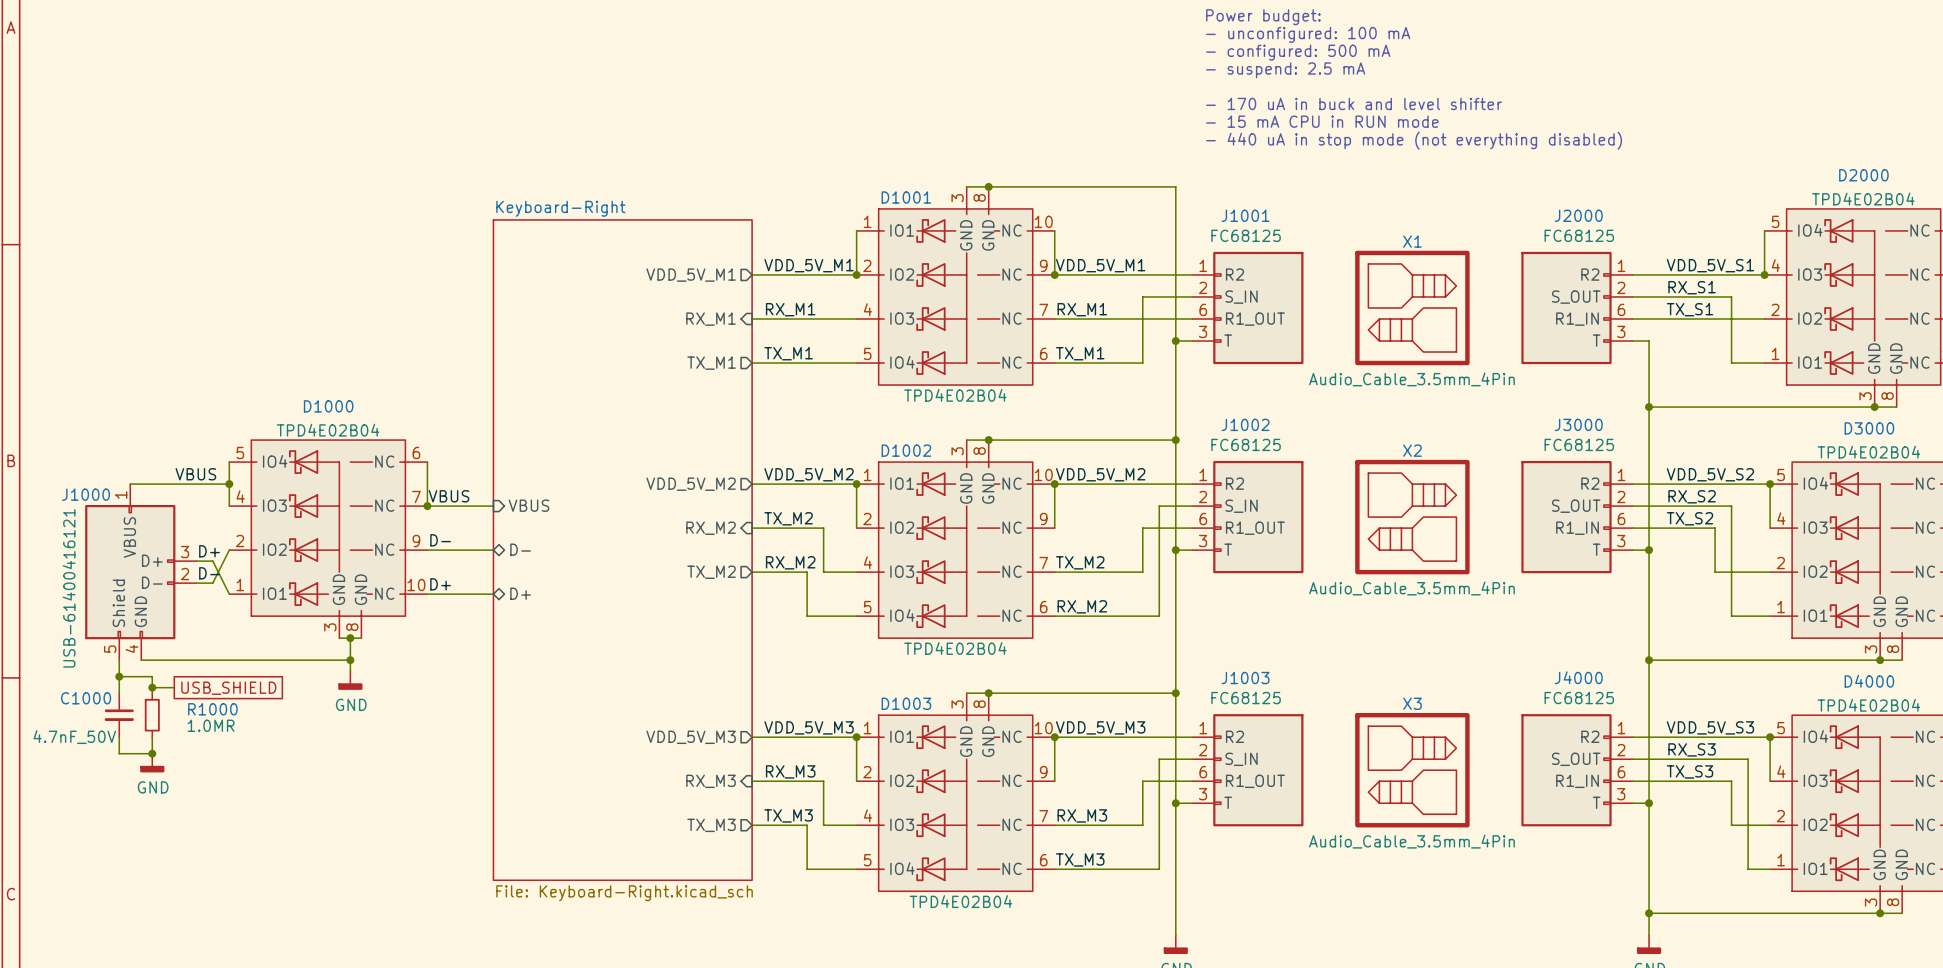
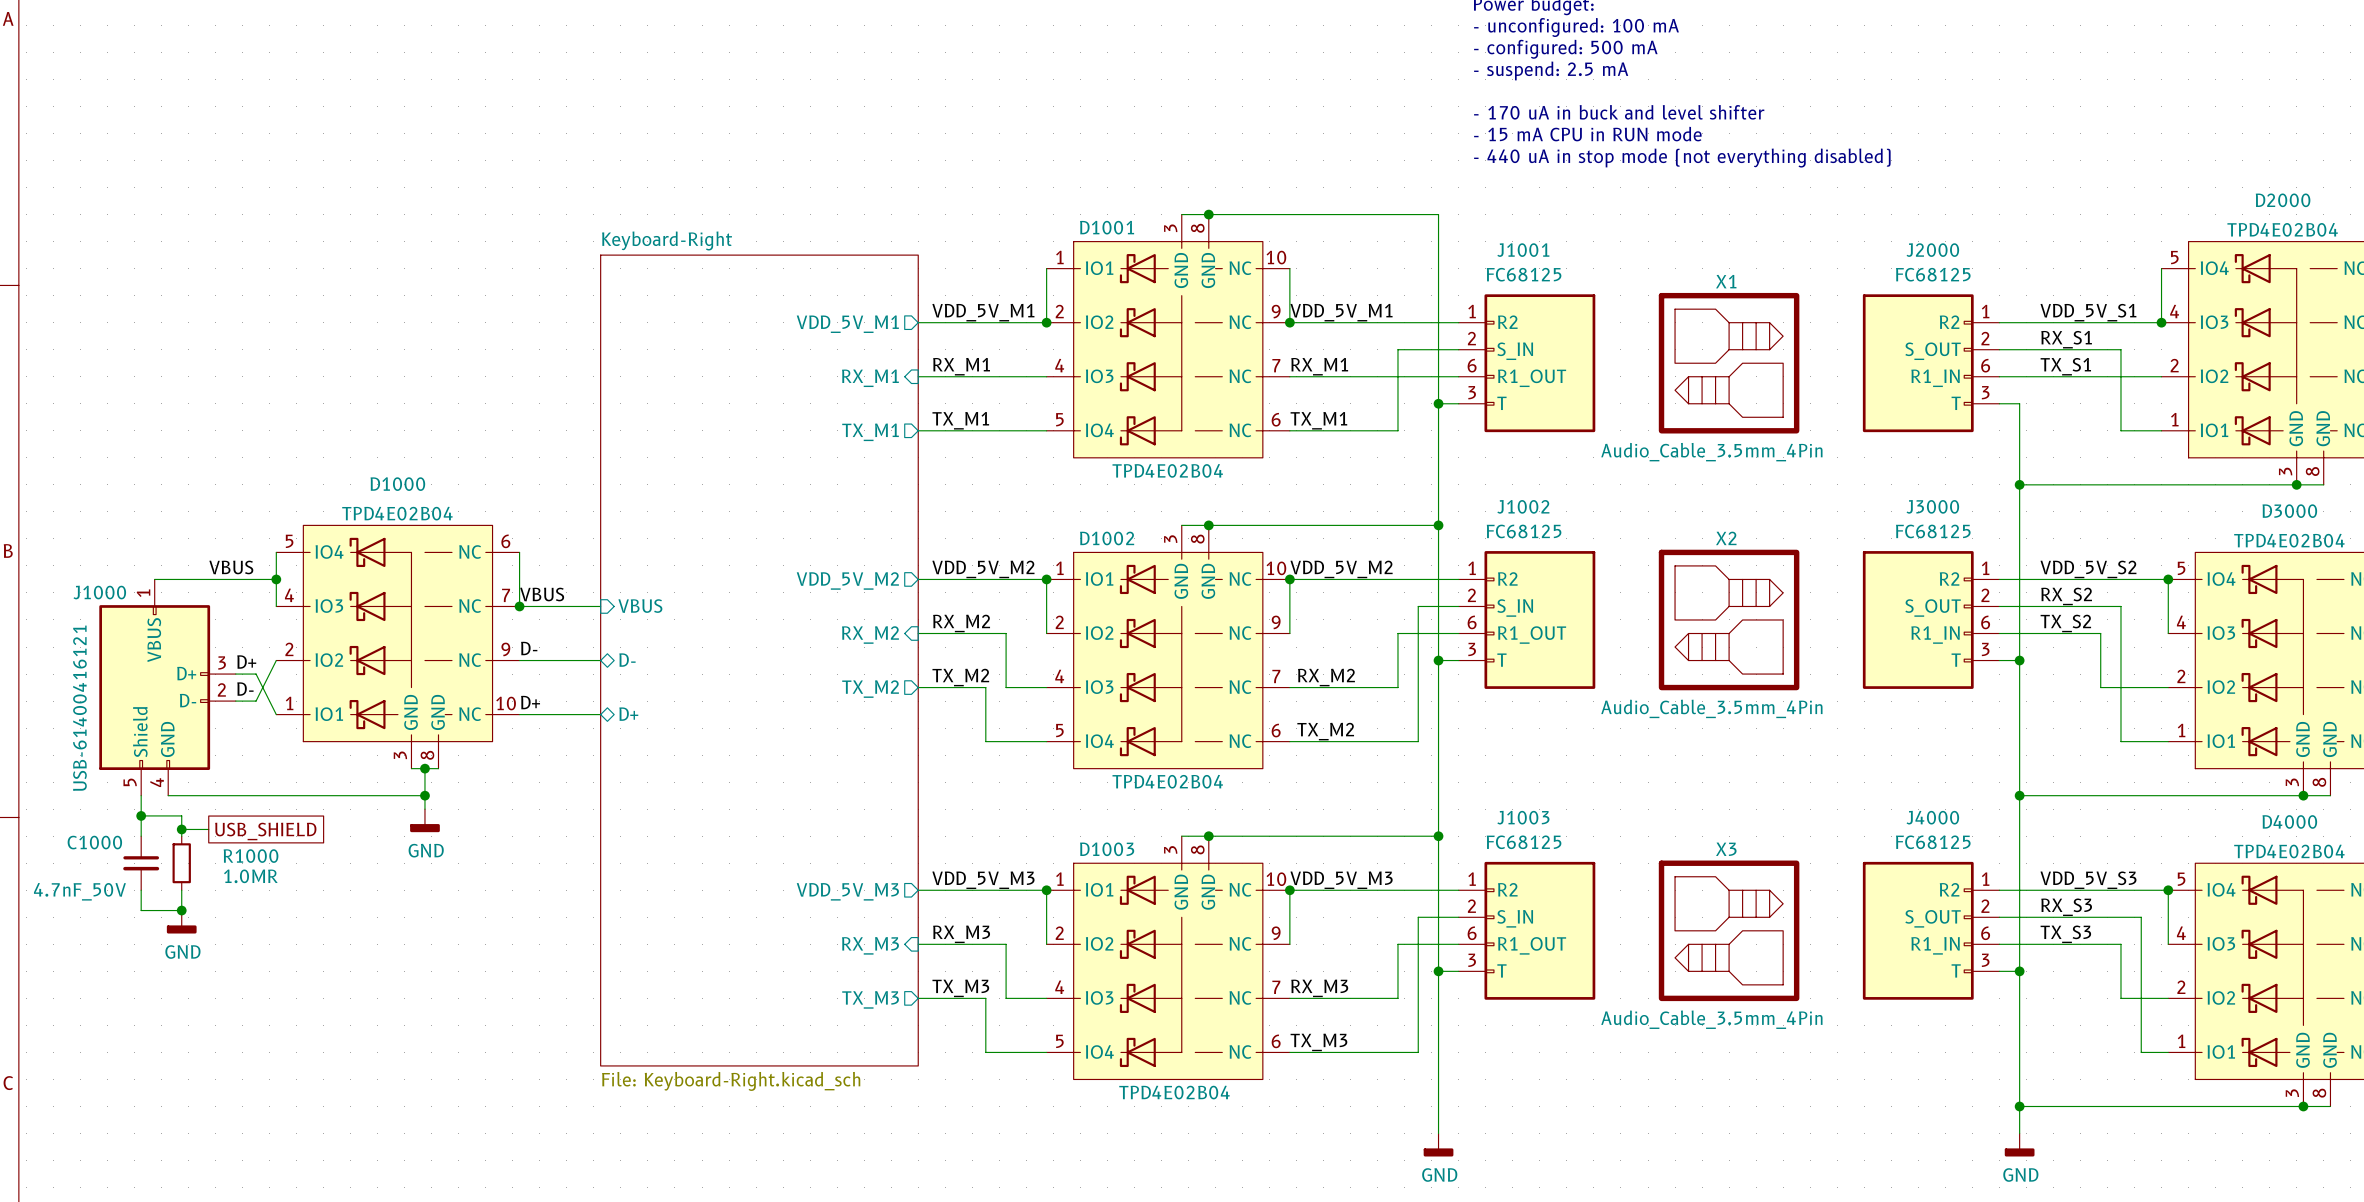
label: TX_M2 (788, 518) -> RX_M2 (961, 623)
label: RX_M2 (790, 562) -> TX_M2 (960, 677)
label: TX_M2 (1080, 562) -> RX_M2 (1326, 677)
label: RX_M2 (1082, 606) -> TX_M2 (1325, 731)

